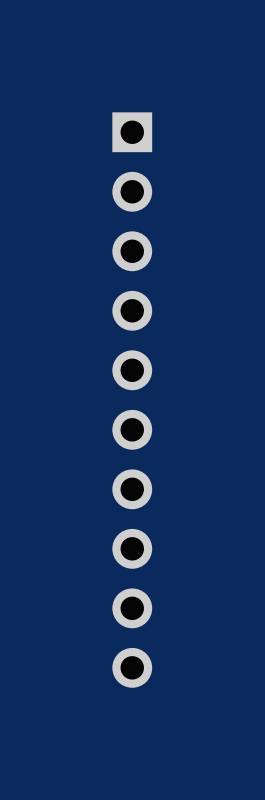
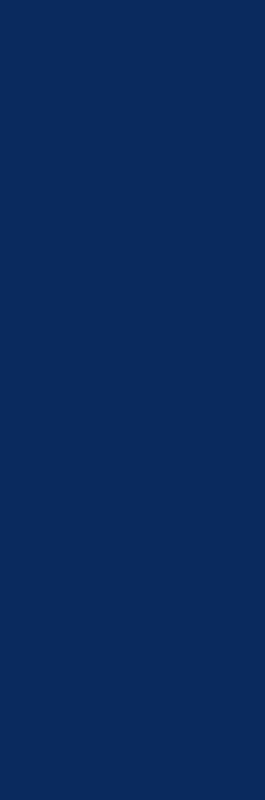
part: (132, 400) -> none

